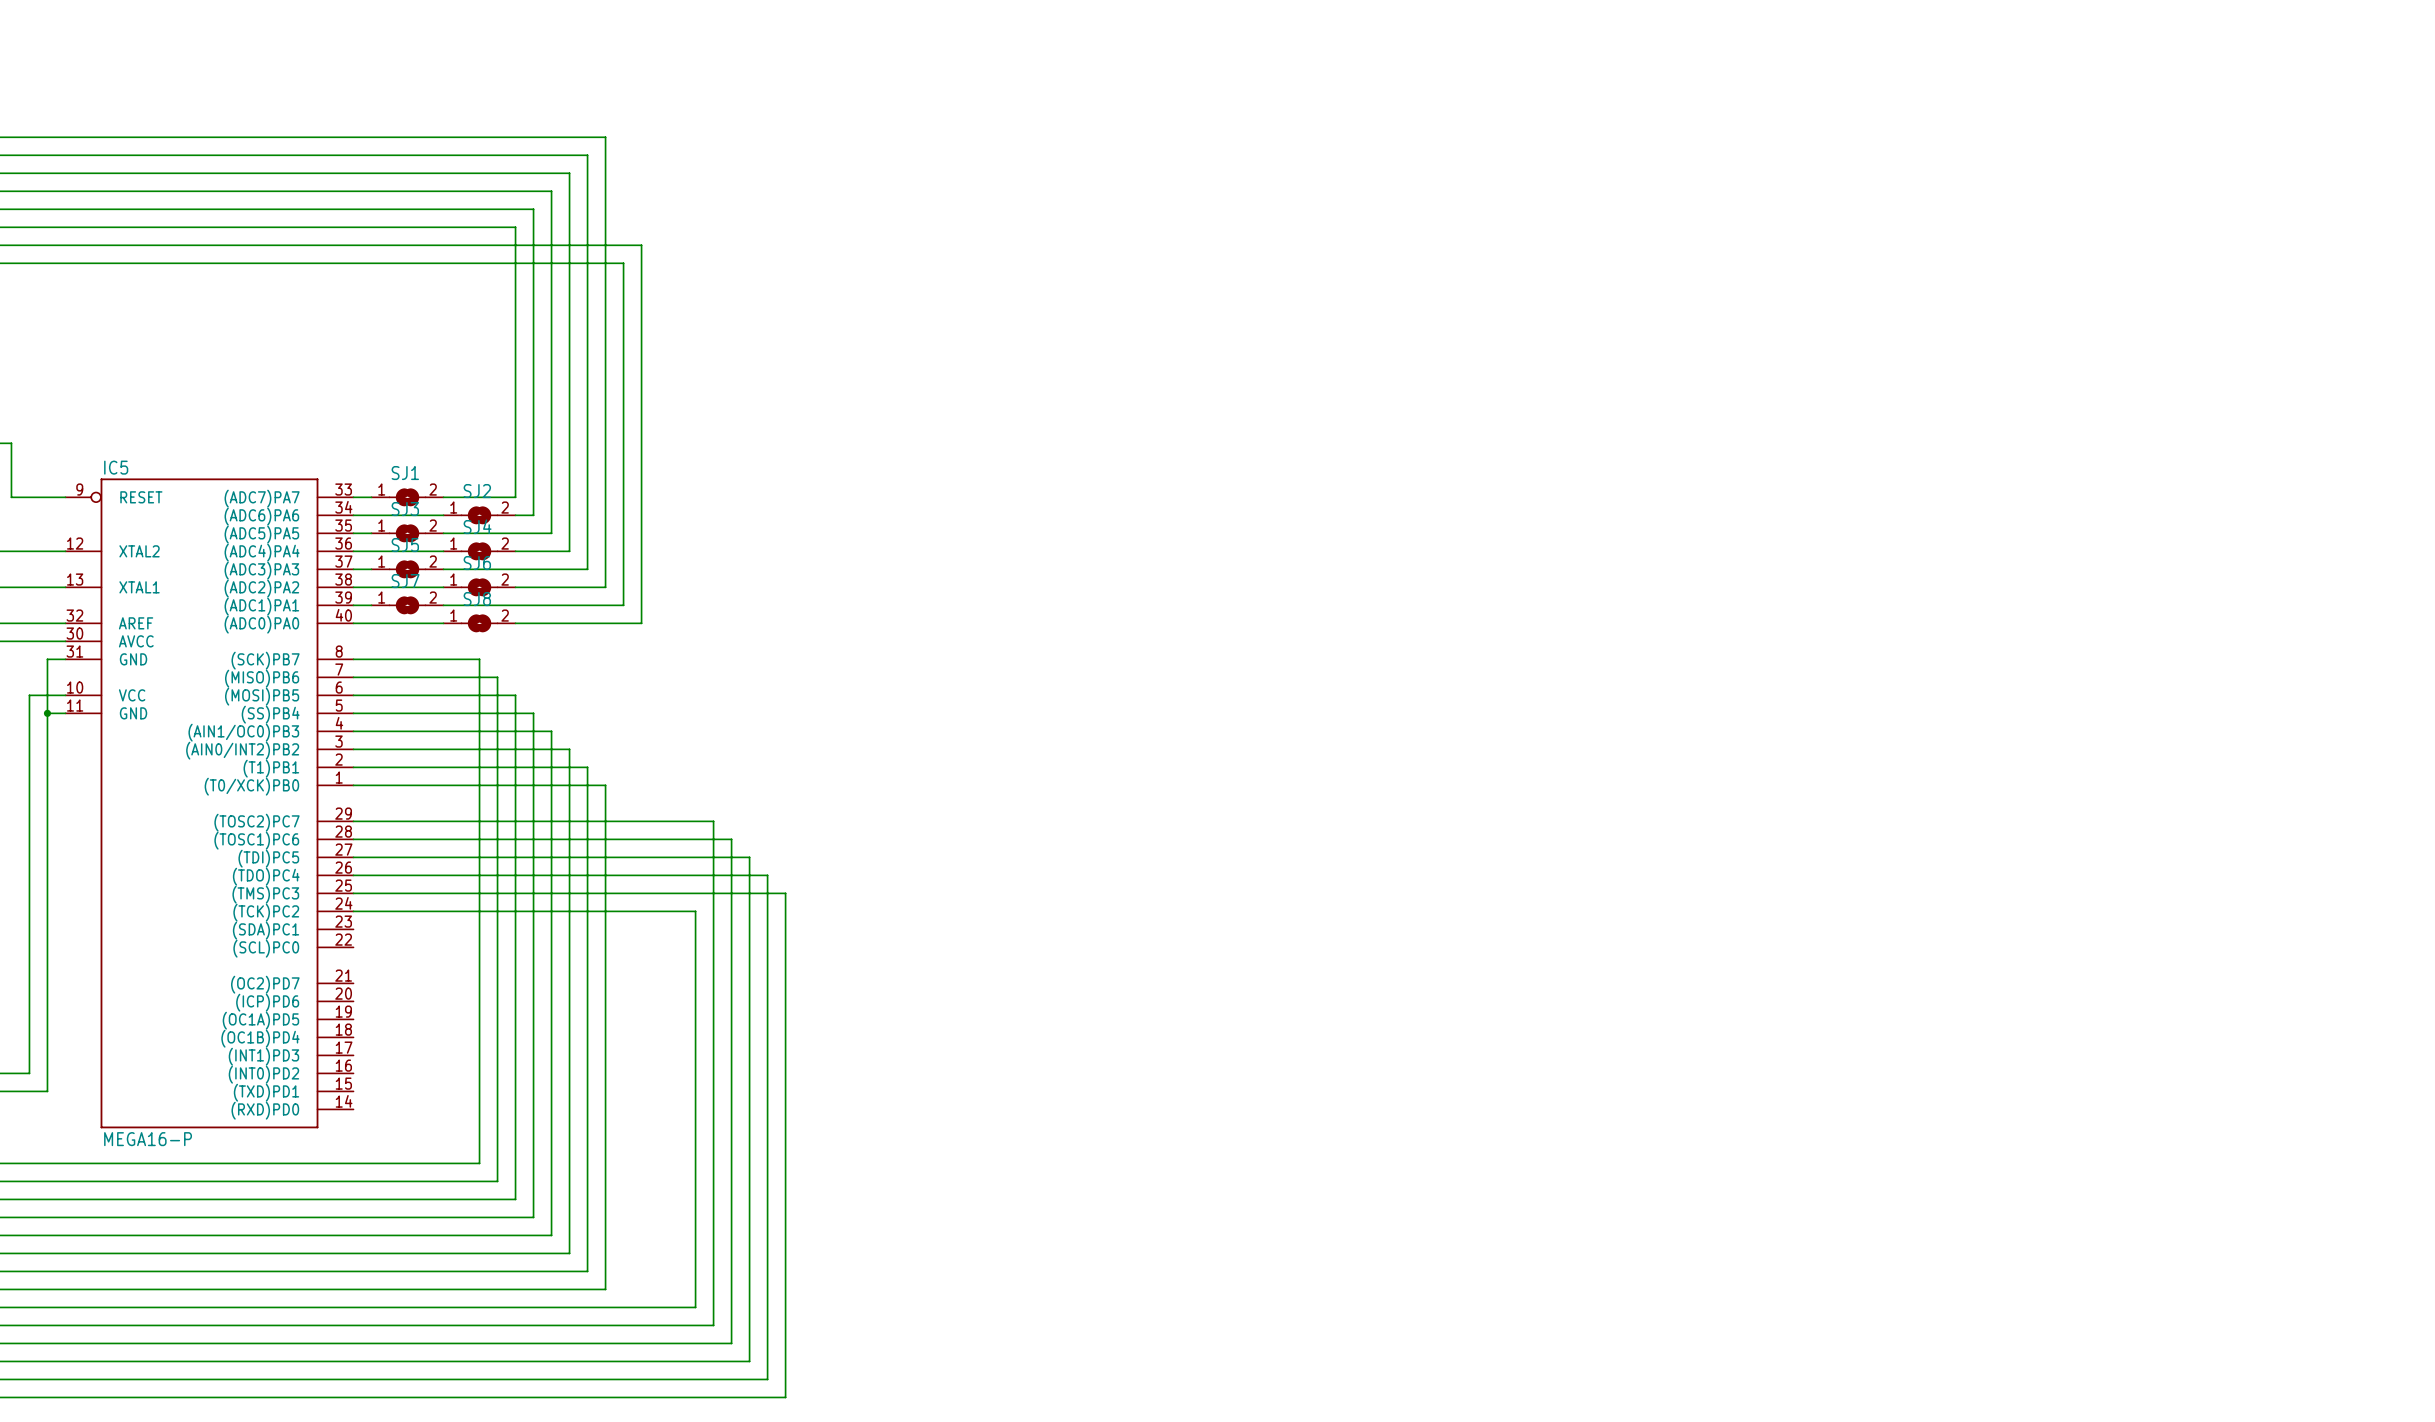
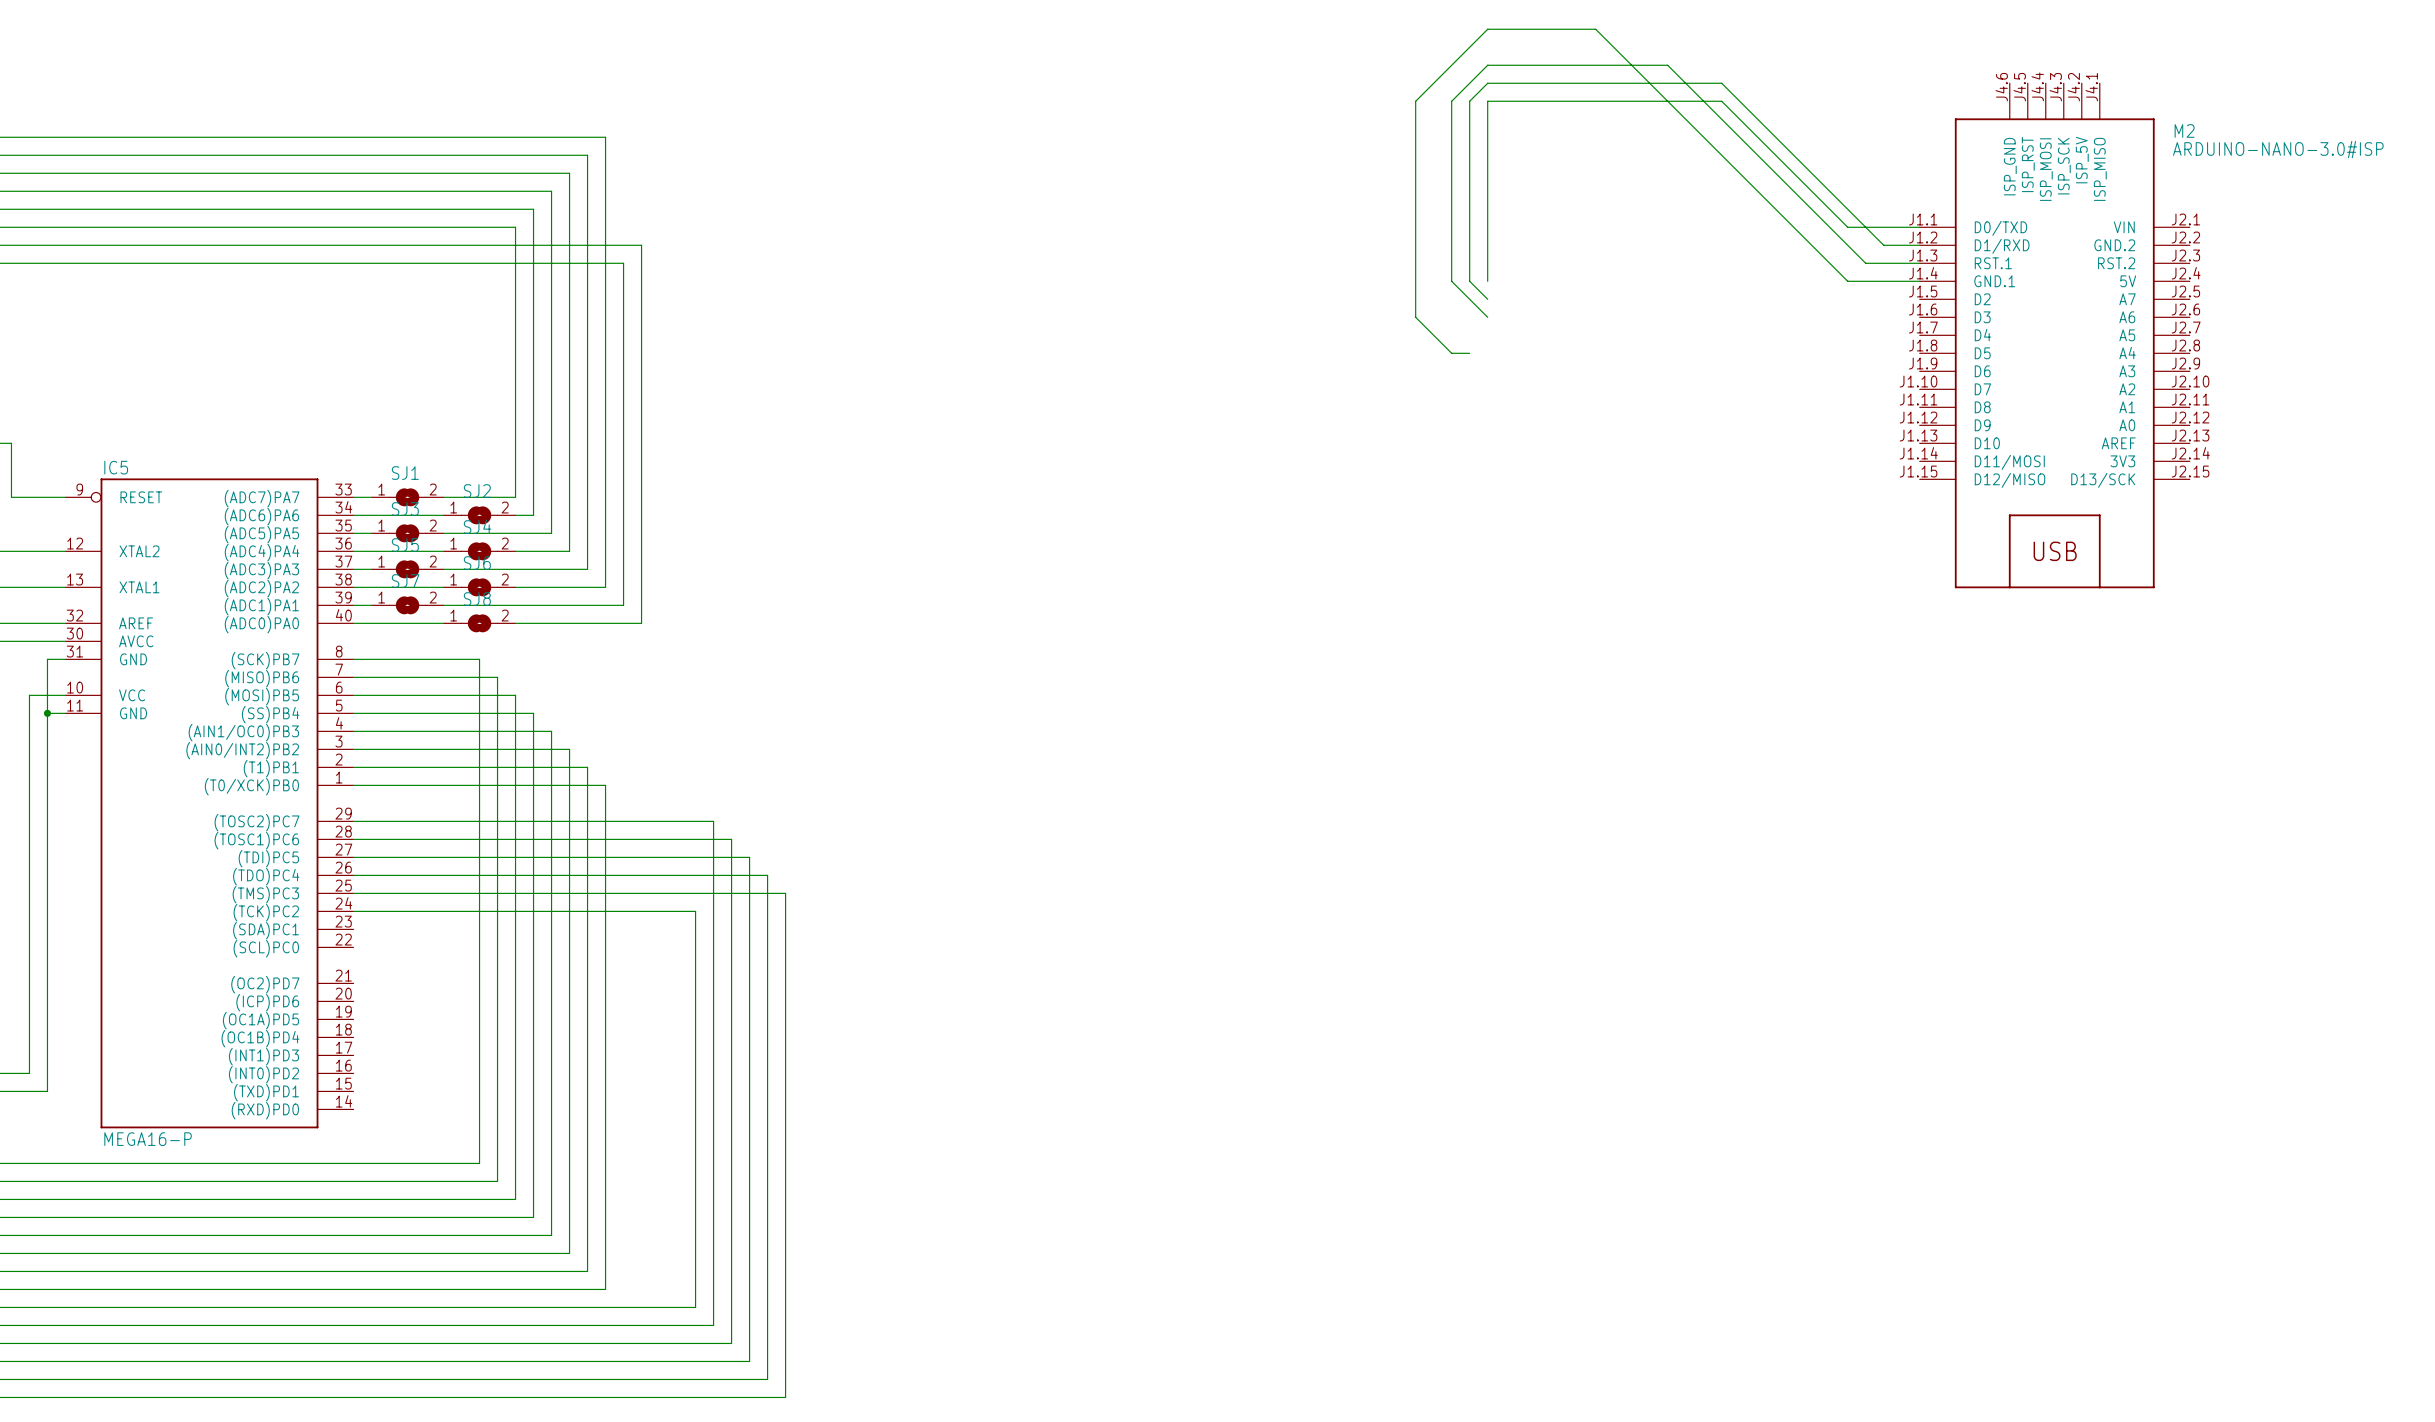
wire: none -> (1919, 227) (1847, 227) (1721, 101) (1487, 101) (1487, 281)
wire: none -> (1919, 245) (1883, 245) (1721, 83) (1487, 83) (1469, 101) (1469, 281) (1487, 299)
wire: none -> (1919, 263) (1865, 263) (1667, 65) (1487, 65) (1451, 101) (1451, 281) (1487, 317)
wire: none -> (1919, 281) (1847, 281) (1595, 29) (1487, 29) (1415, 101) (1415, 317) (1451, 353) (1469, 353)
M2: none -> ARDUINO-NANO-3.0#ISP (2054, 335)

